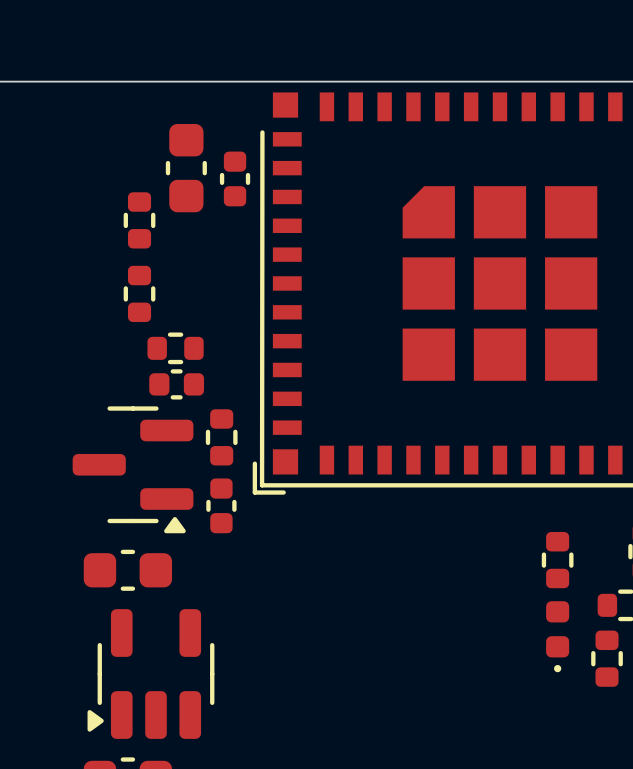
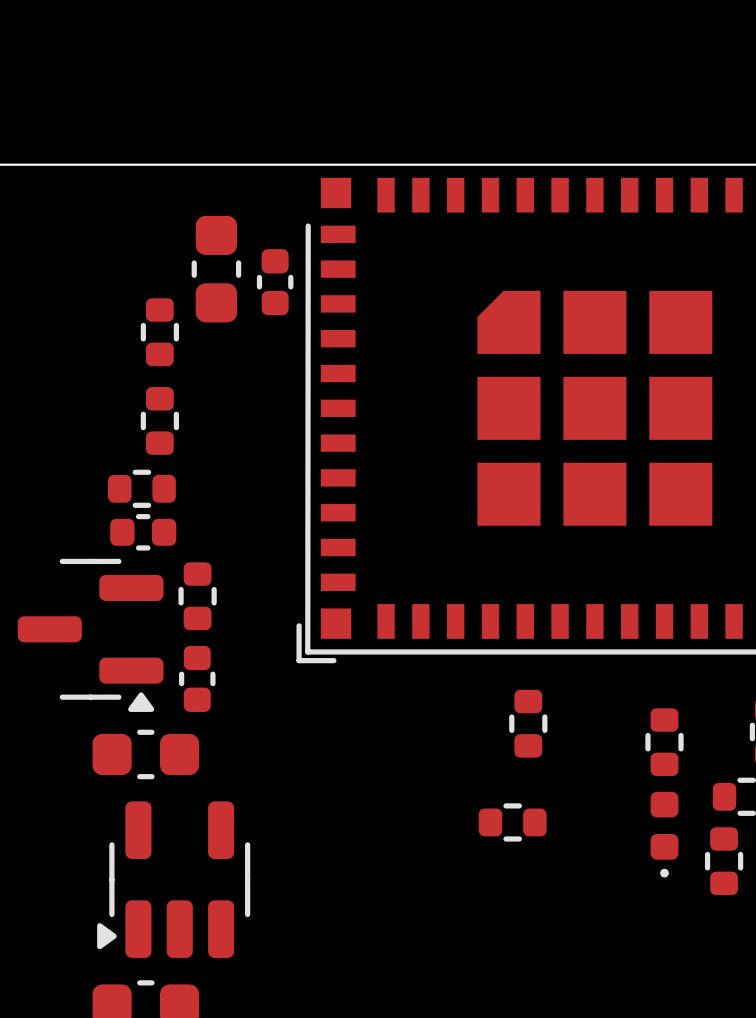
part: (175, 348) -> none
part: none -> (141, 488)
part position: (176, 384) -> (143, 532)
part: (221, 437) -> none
part: none -> (197, 596)
part position: (133, 469) -> (90, 635)
part position: (221, 505) -> (197, 678)
part: none -> (528, 723)
part: none -> (512, 822)

